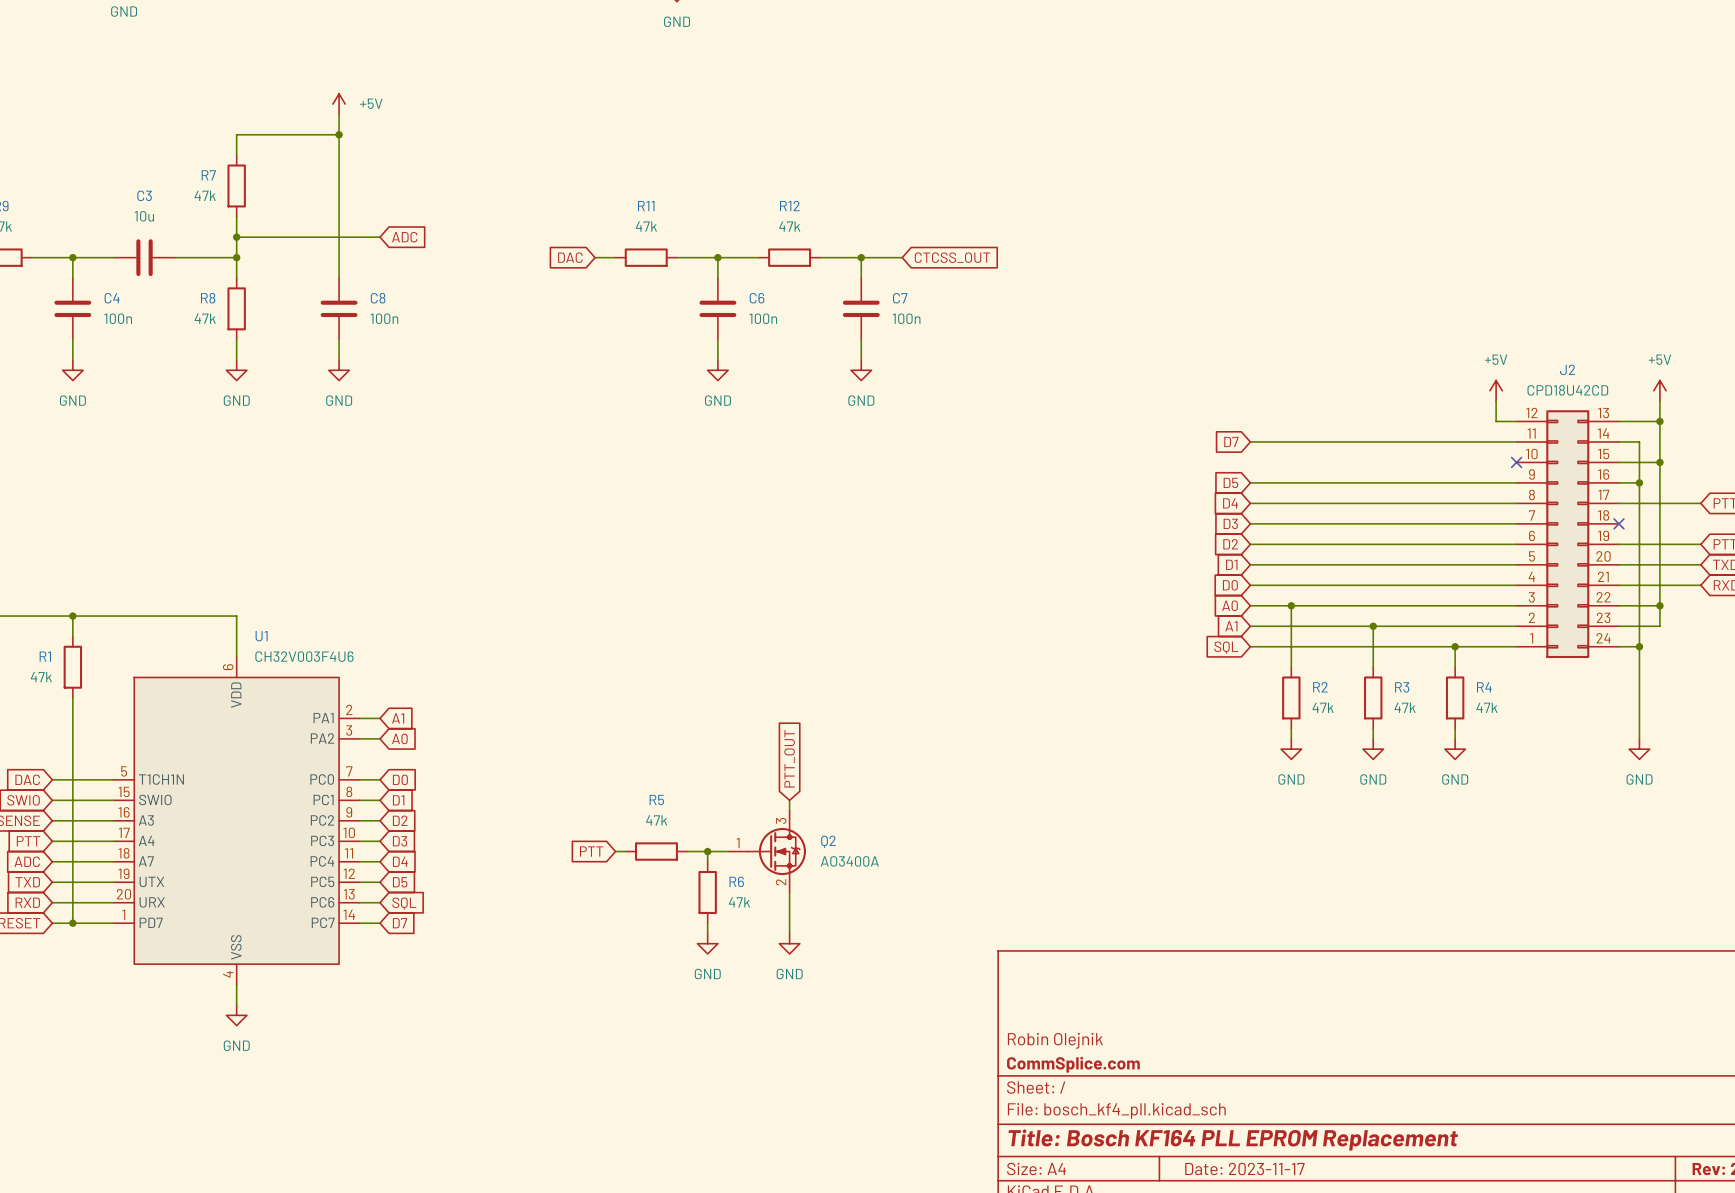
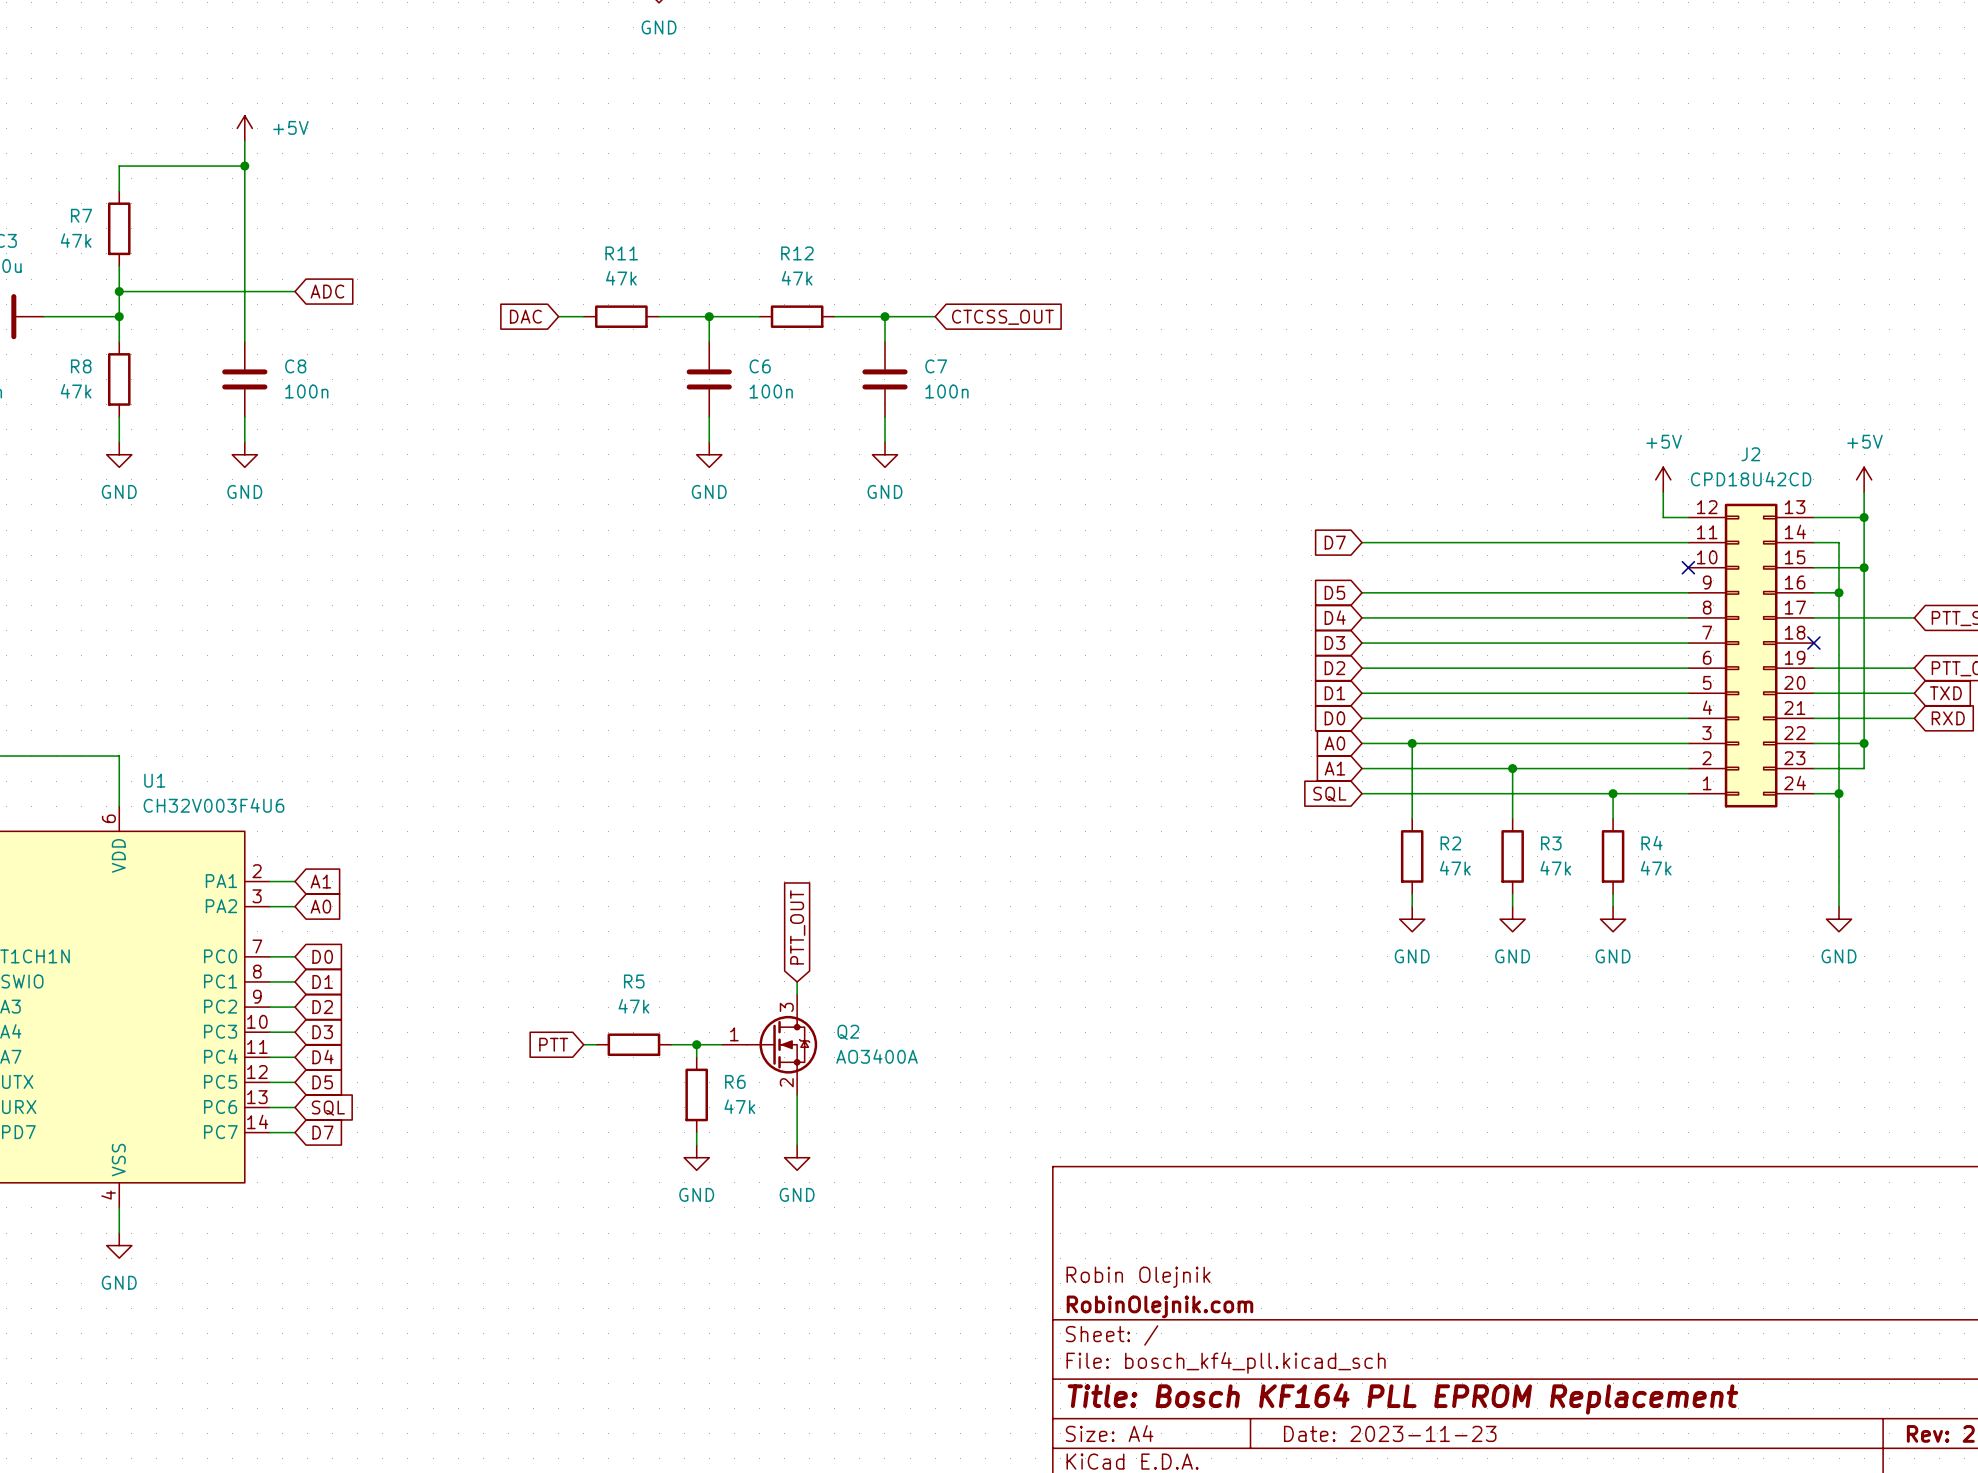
title block: CommSplice.com (1073, 1064) -> RobinOlejnik.com (1159, 1306)
title block: Date: 2023-11-17 (1244, 1168) -> Date: 2023-11-23 (1390, 1433)

